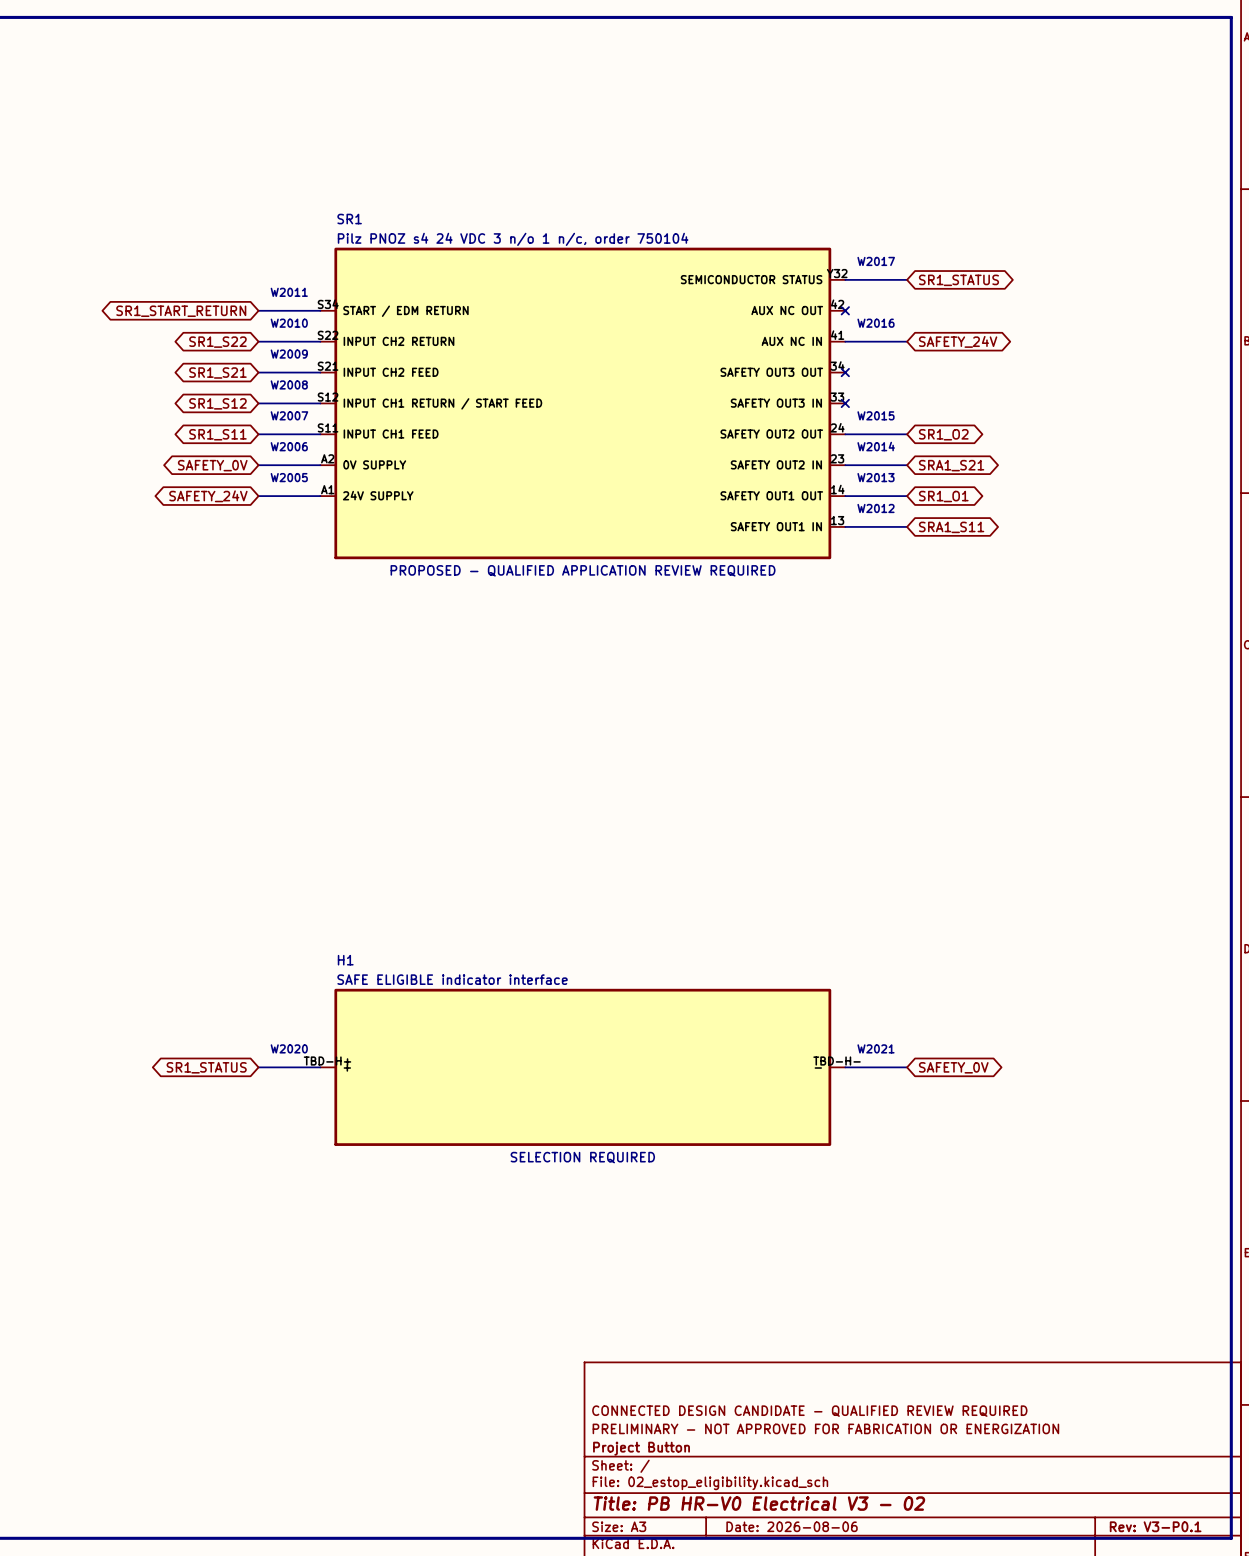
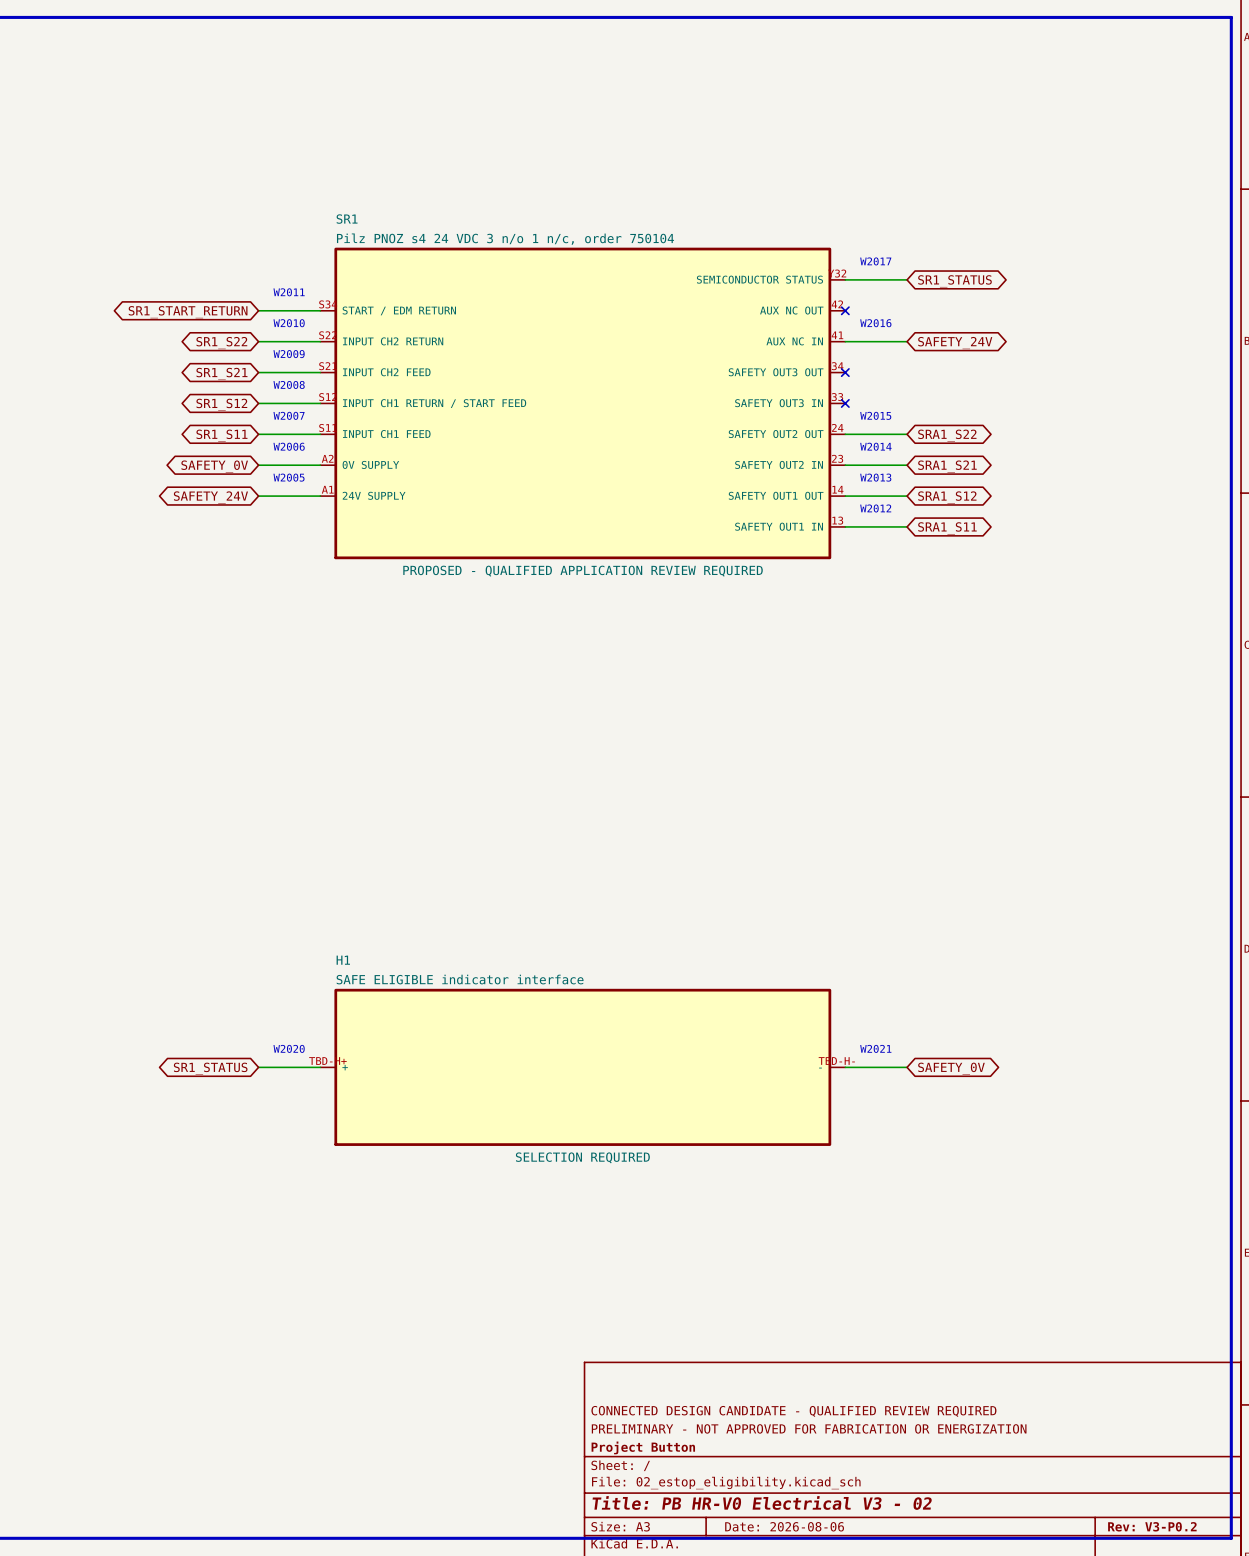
global label: SR1_O2 (943, 434) -> SRA1_S22 (947, 435)
global label: SR1_O1 (943, 496) -> SRA1_S12 (947, 497)
title block: Rev: V3-P0.1 (1155, 1526) -> Rev: V3-P0.2 (1152, 1526)

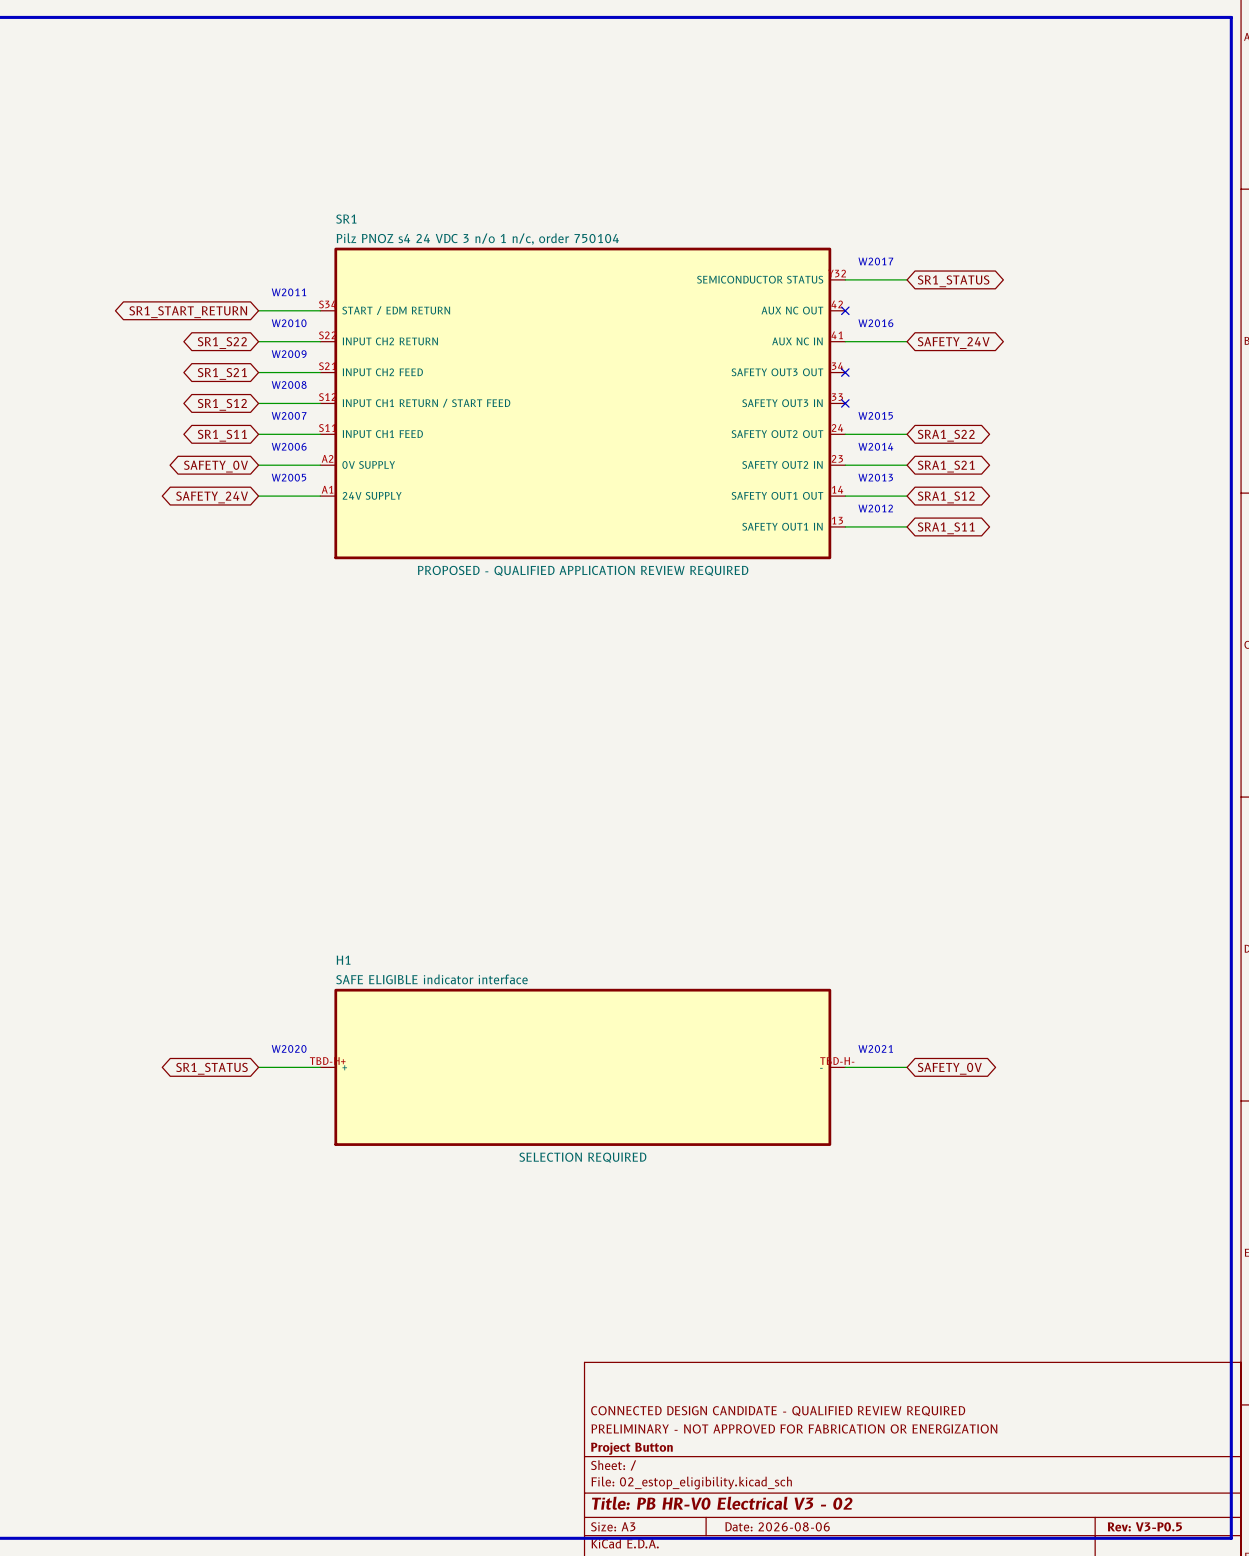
title block: Rev: V3-P0.2 (1152, 1526) -> Rev: V3-P0.5 (1144, 1526)

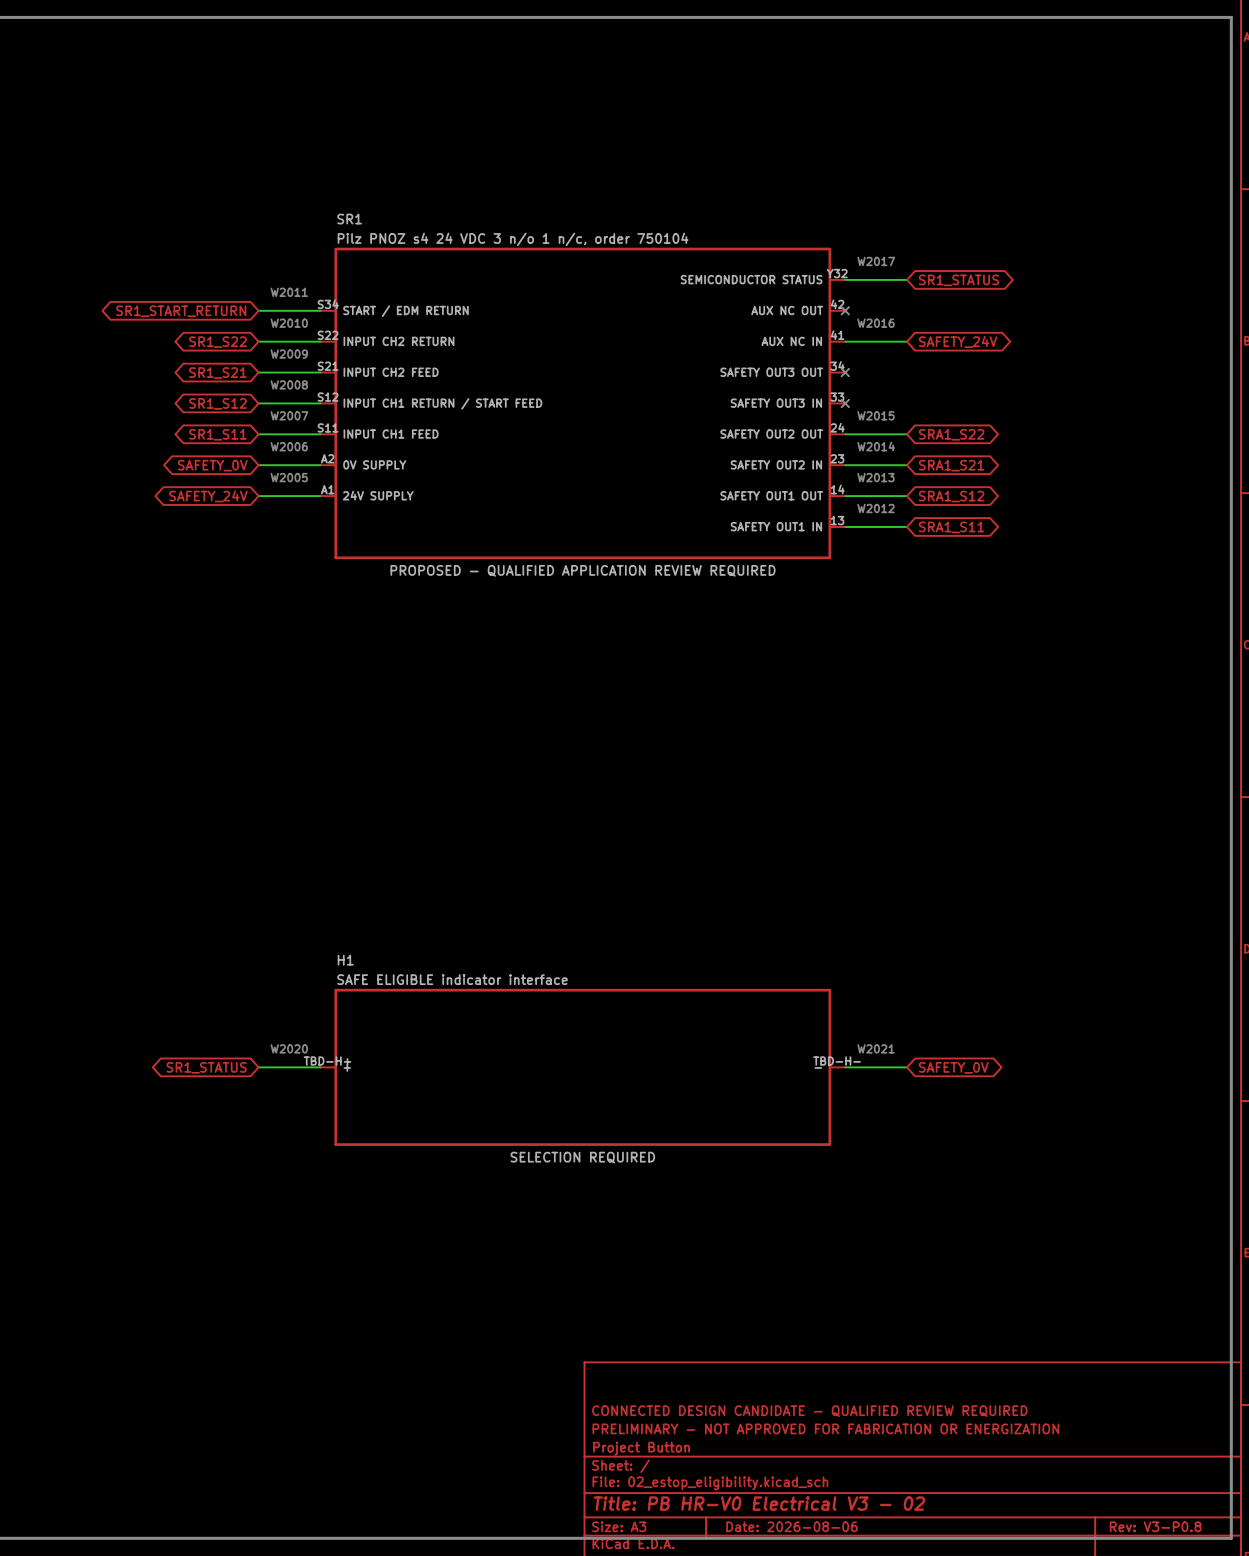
title block: Rev: V3-P0.5 (1144, 1526) -> Rev: V3-P0.8 (1155, 1526)

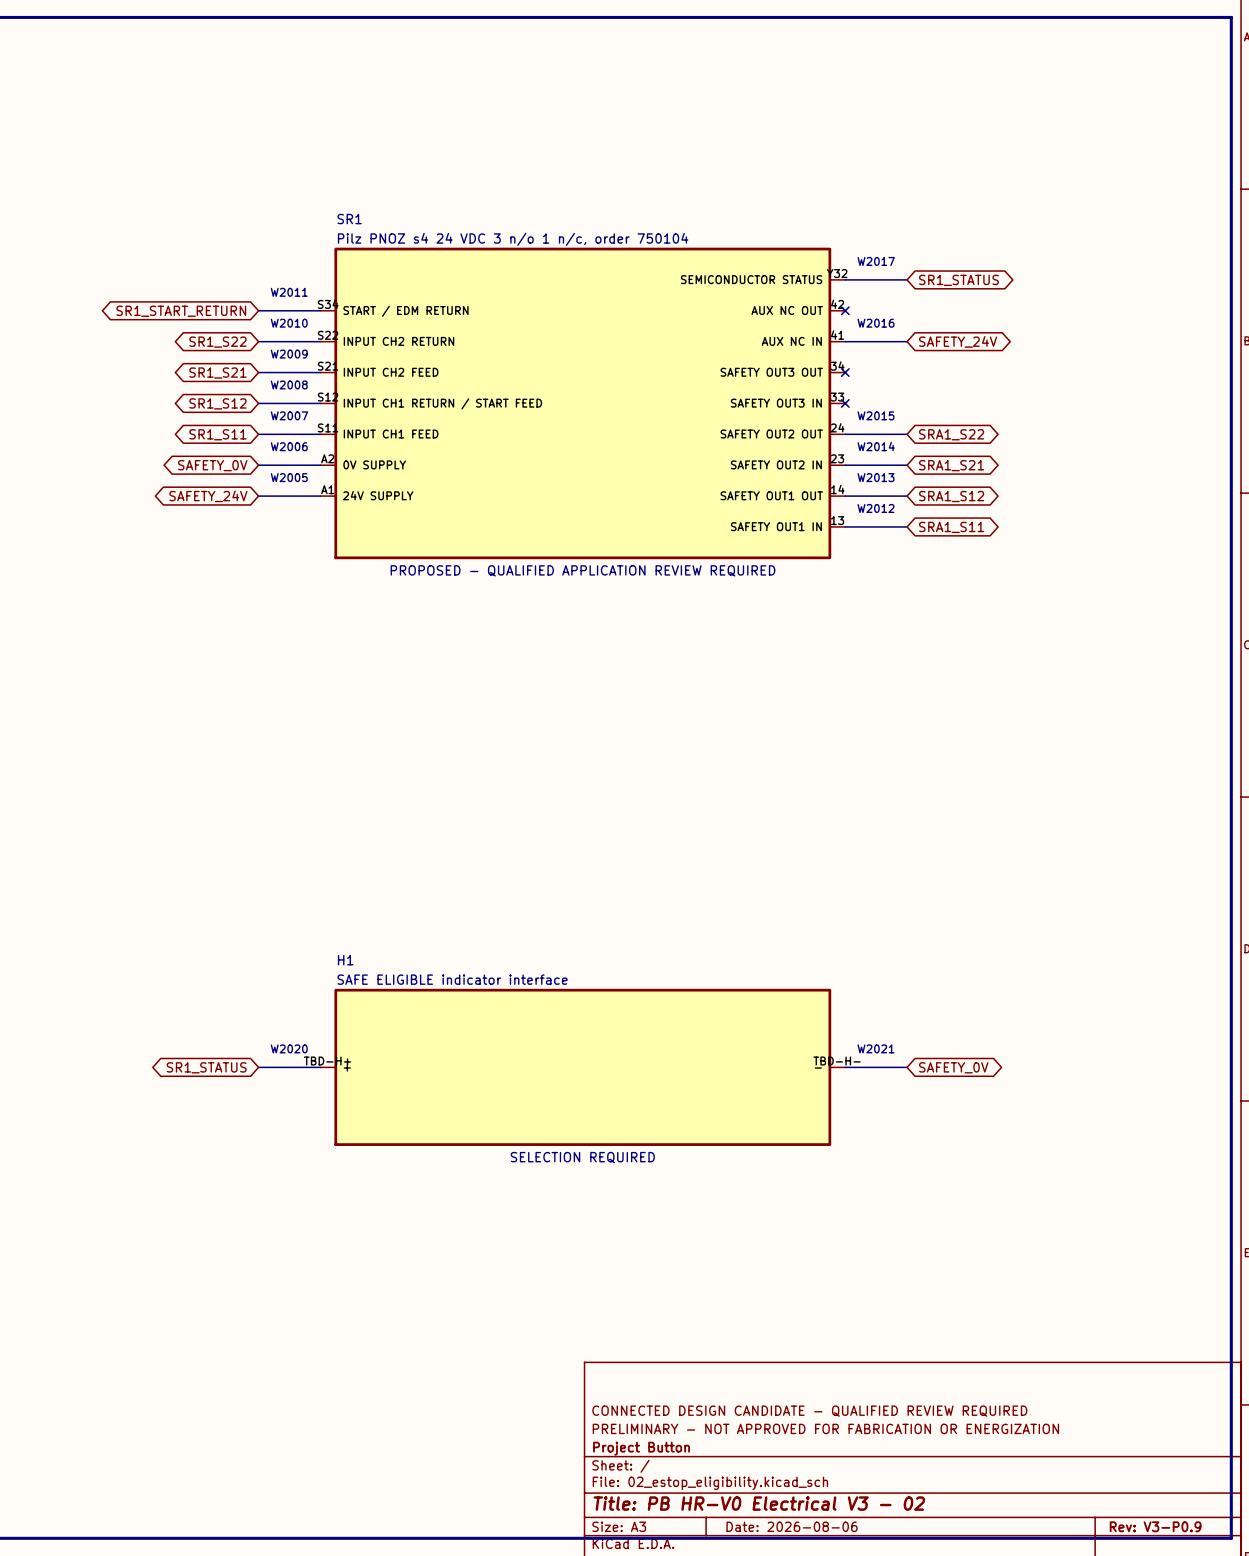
title block: Rev: V3-P0.8 (1155, 1526) -> Rev: V3-P0.9 (1155, 1526)

